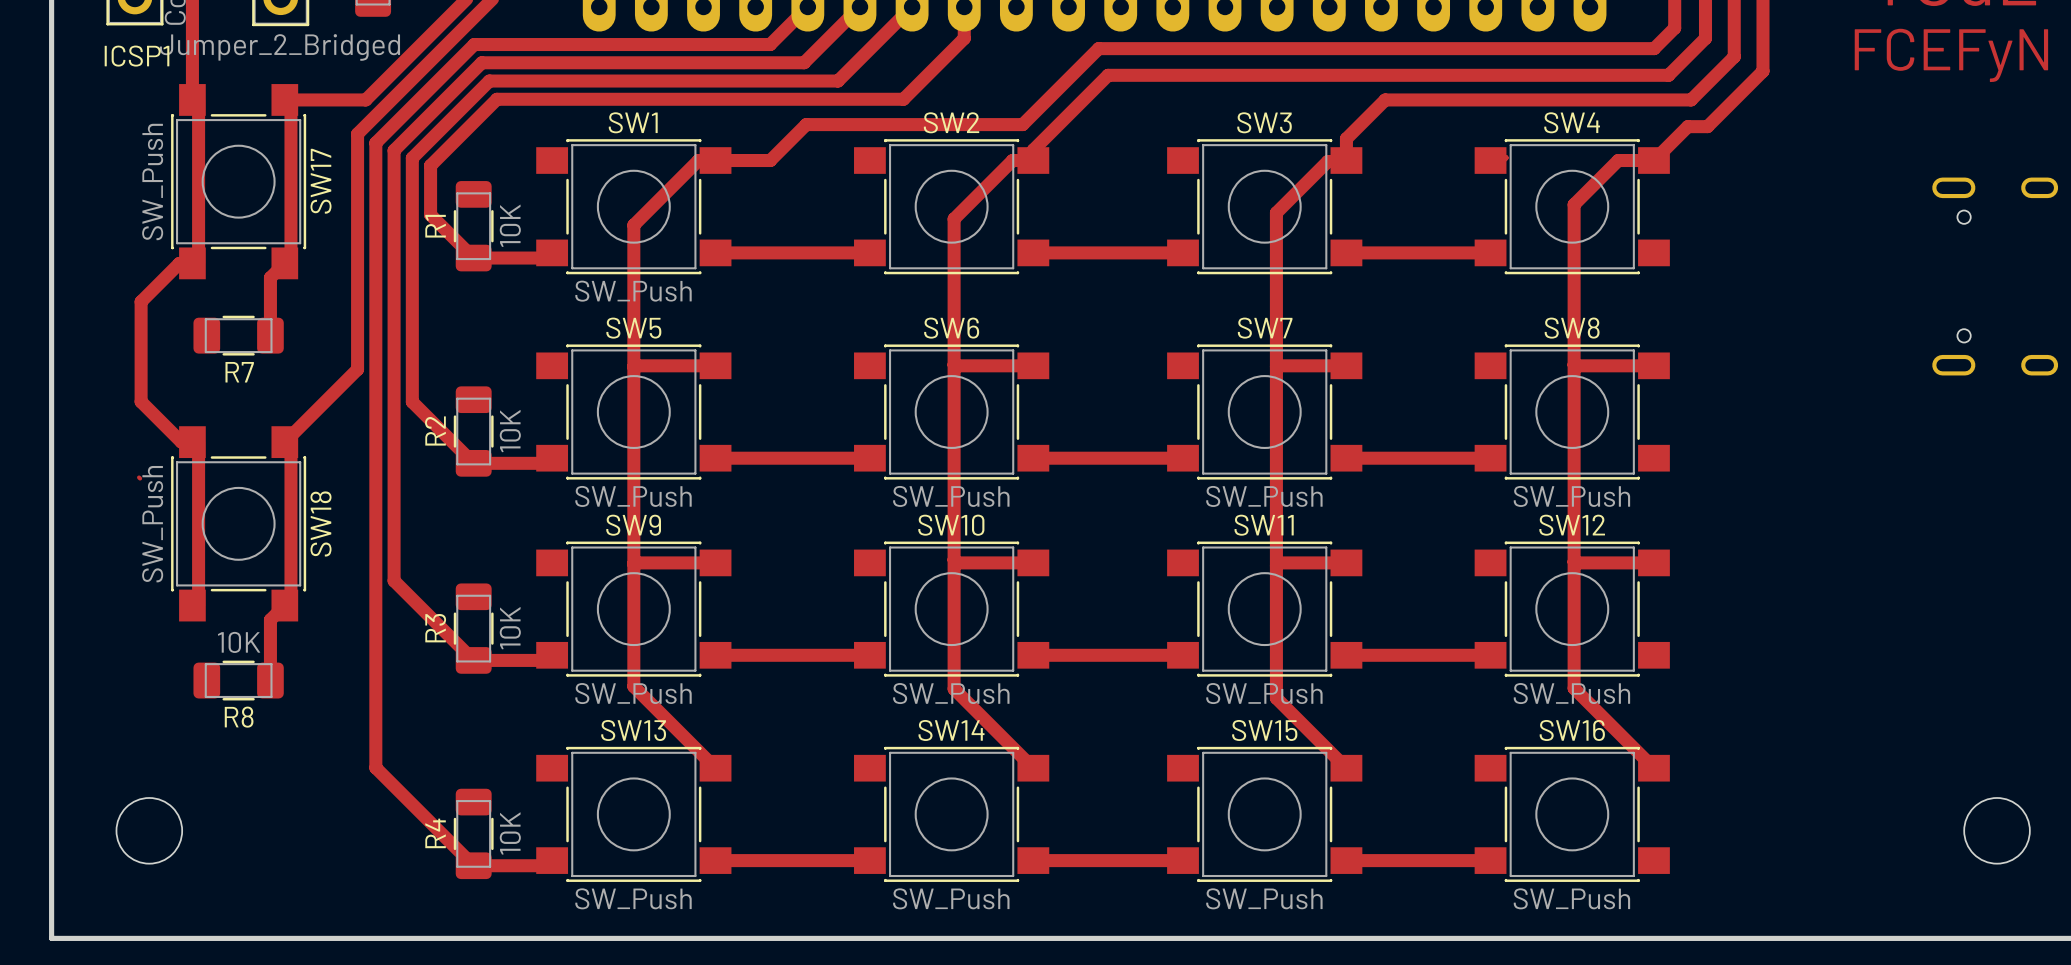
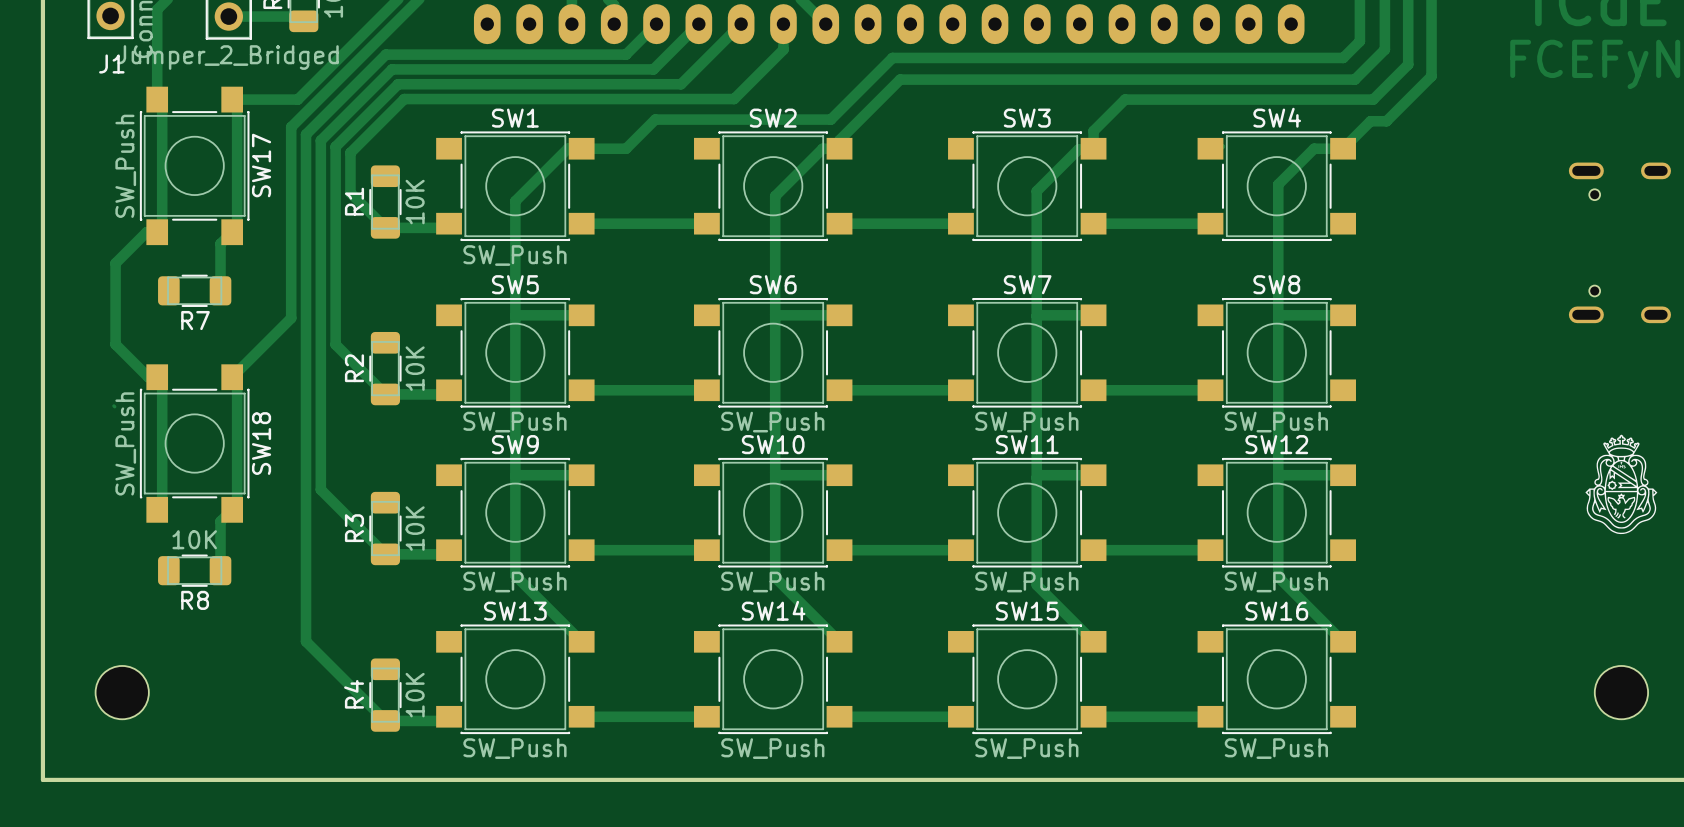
ICSP1 name: ICSP1 (137, 56) -> J1 (111, 63)
drawing: none -> [1585, 434, 1658, 535]

